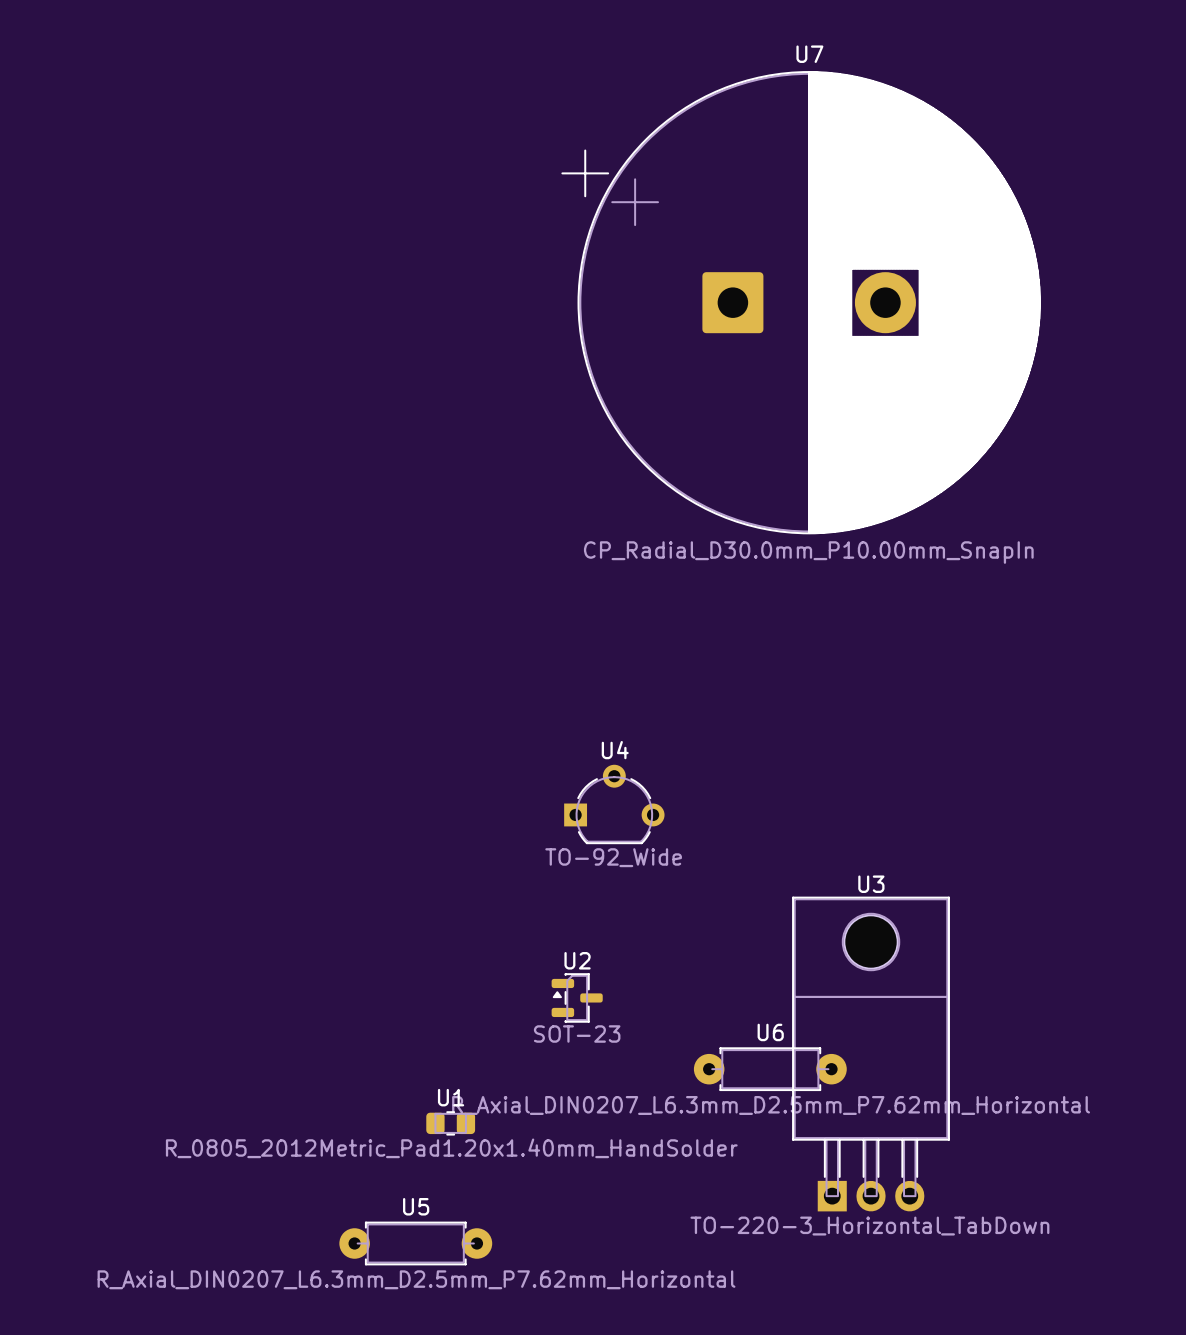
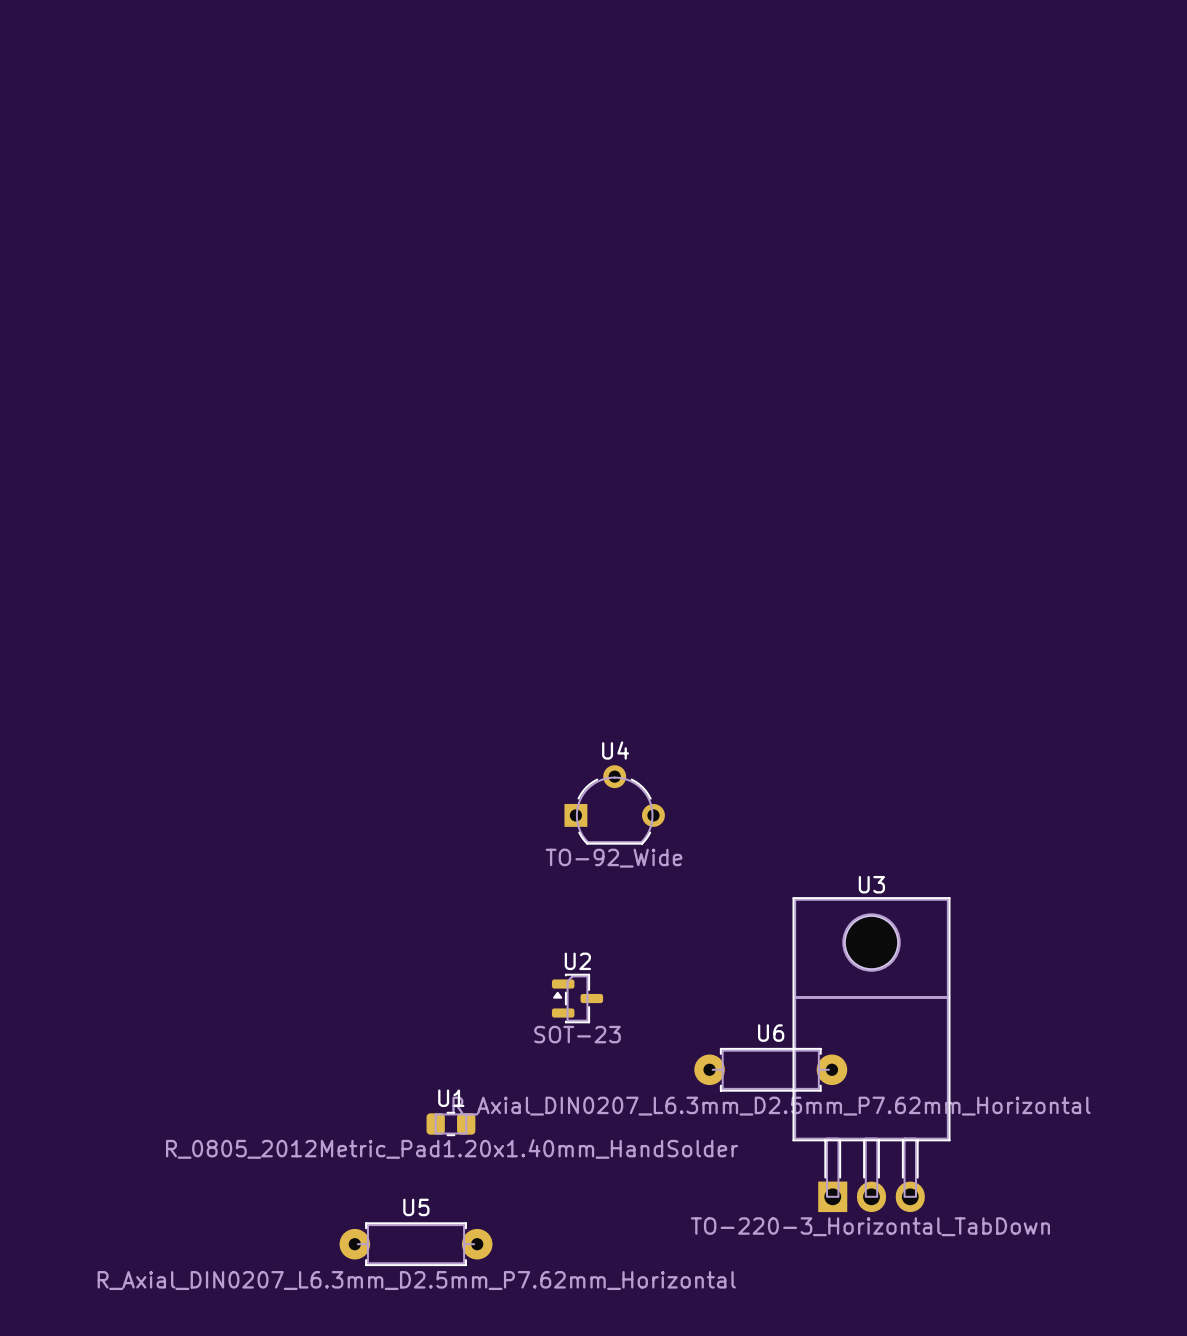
U7: CP_Radial_D30.0mm_P10.00mm_SnapIn (801, 302) -> none

